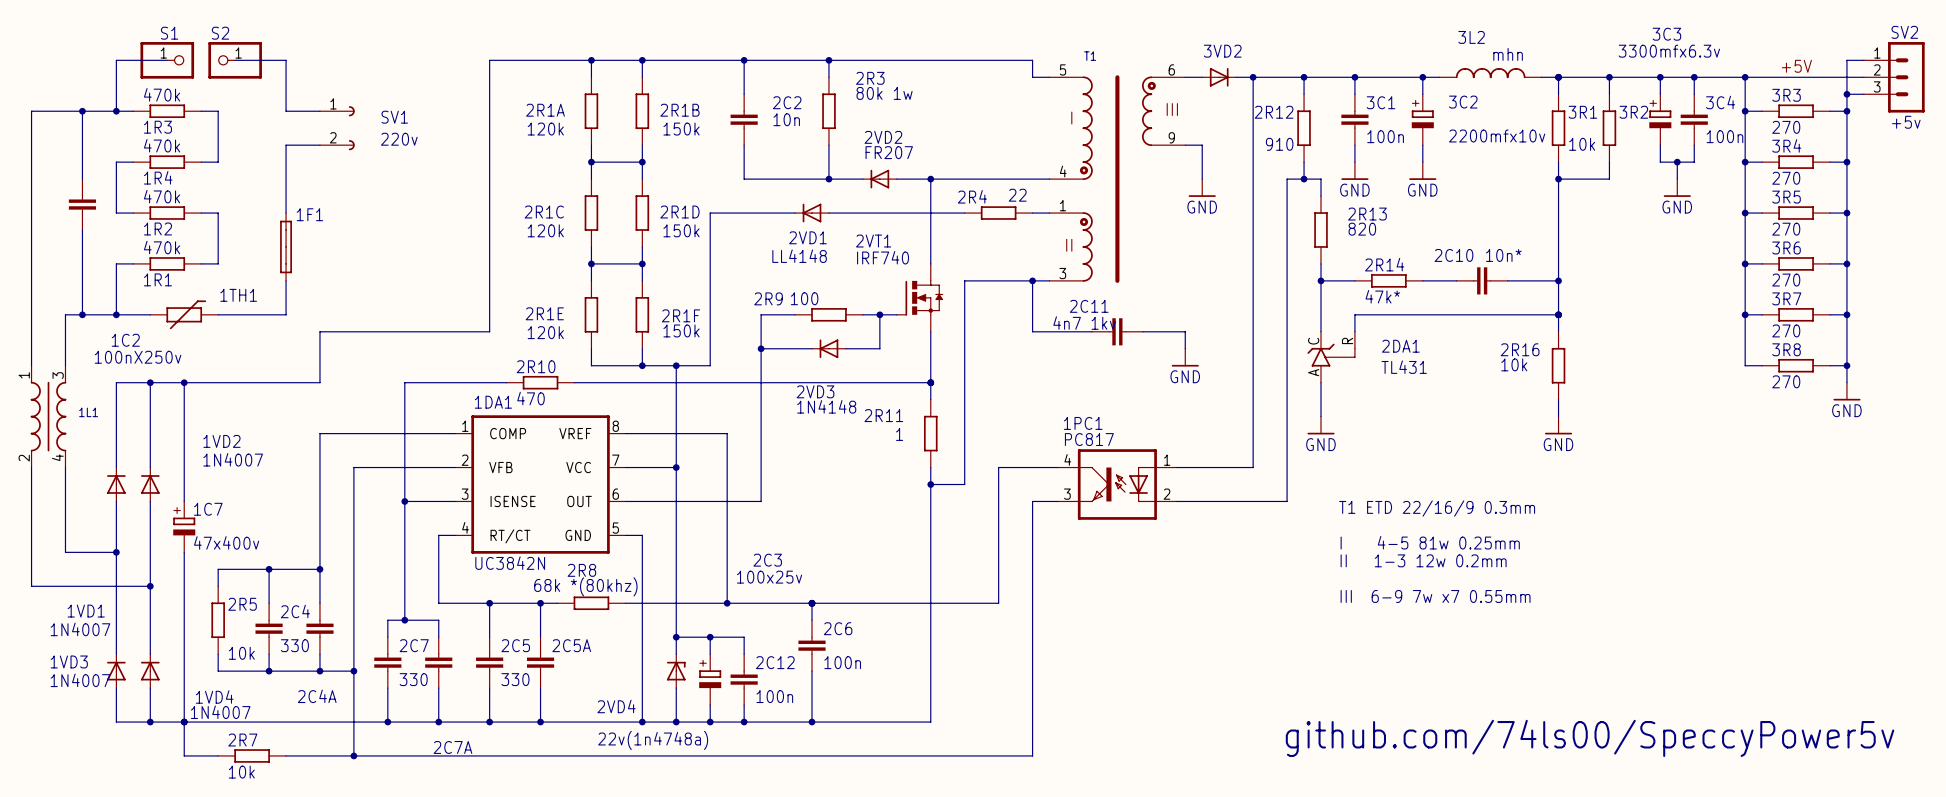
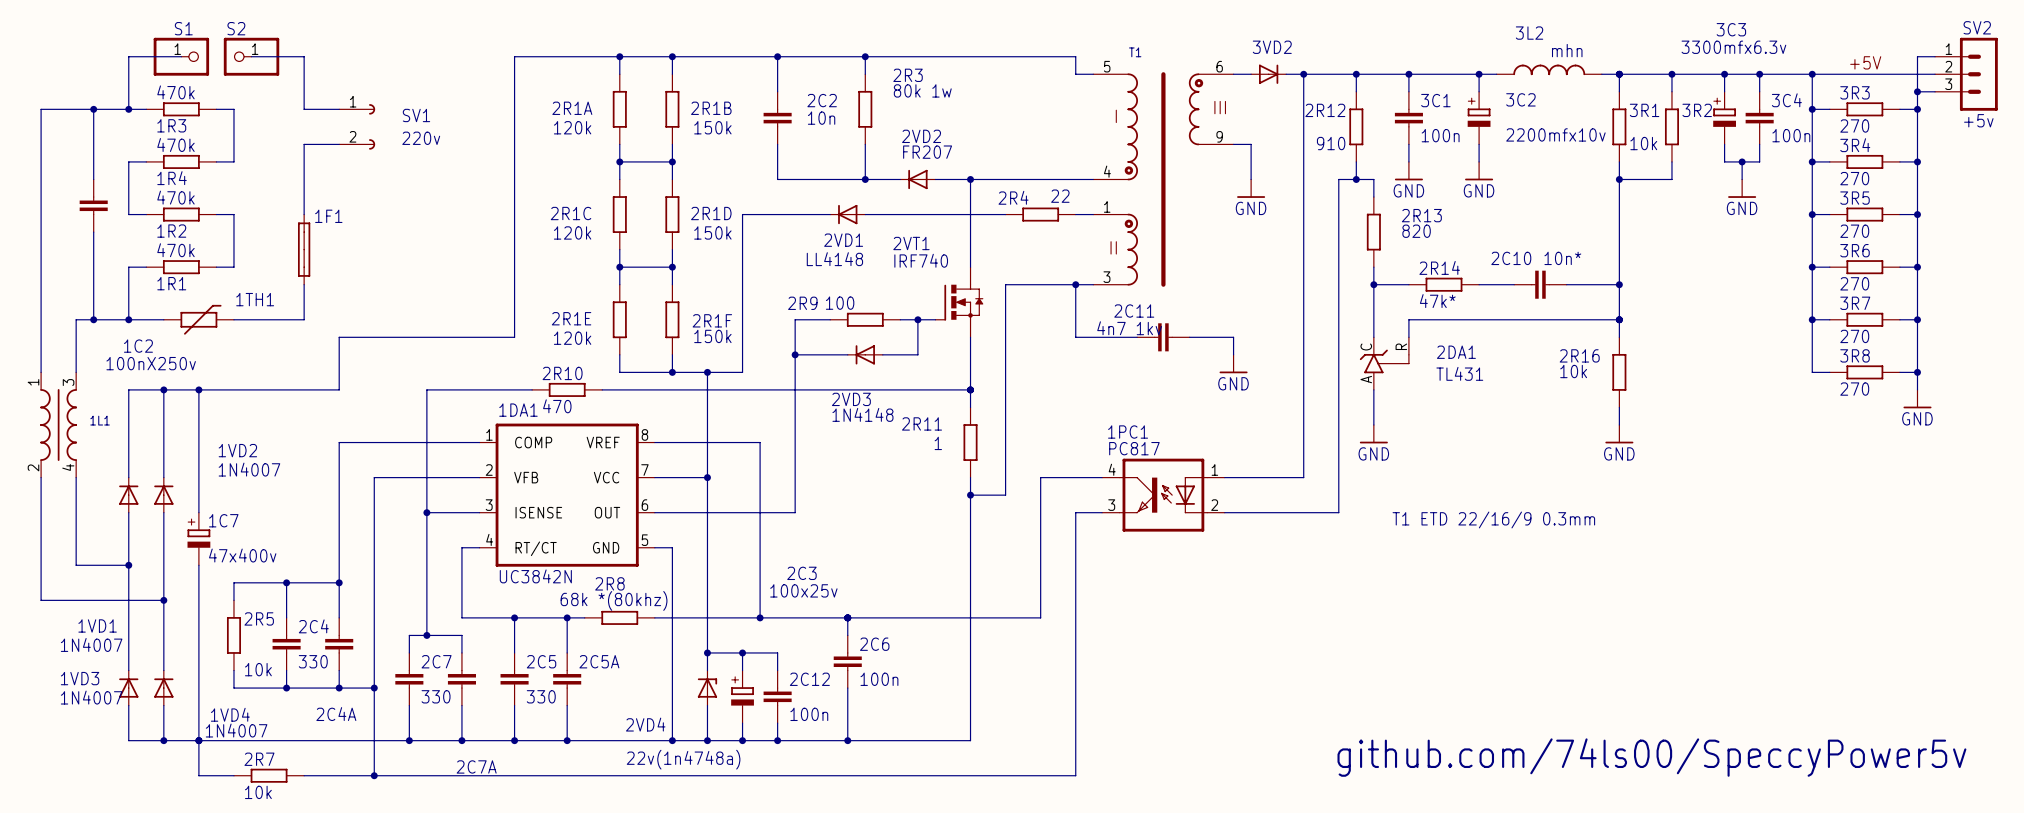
text: I 4-5 81w 0.25mm (1430, 542) -> none
text: II 1-3 12w 0.2mm (1423, 560) -> none
text: III 6-9 7w x7 0.55mm (1435, 596) -> none

